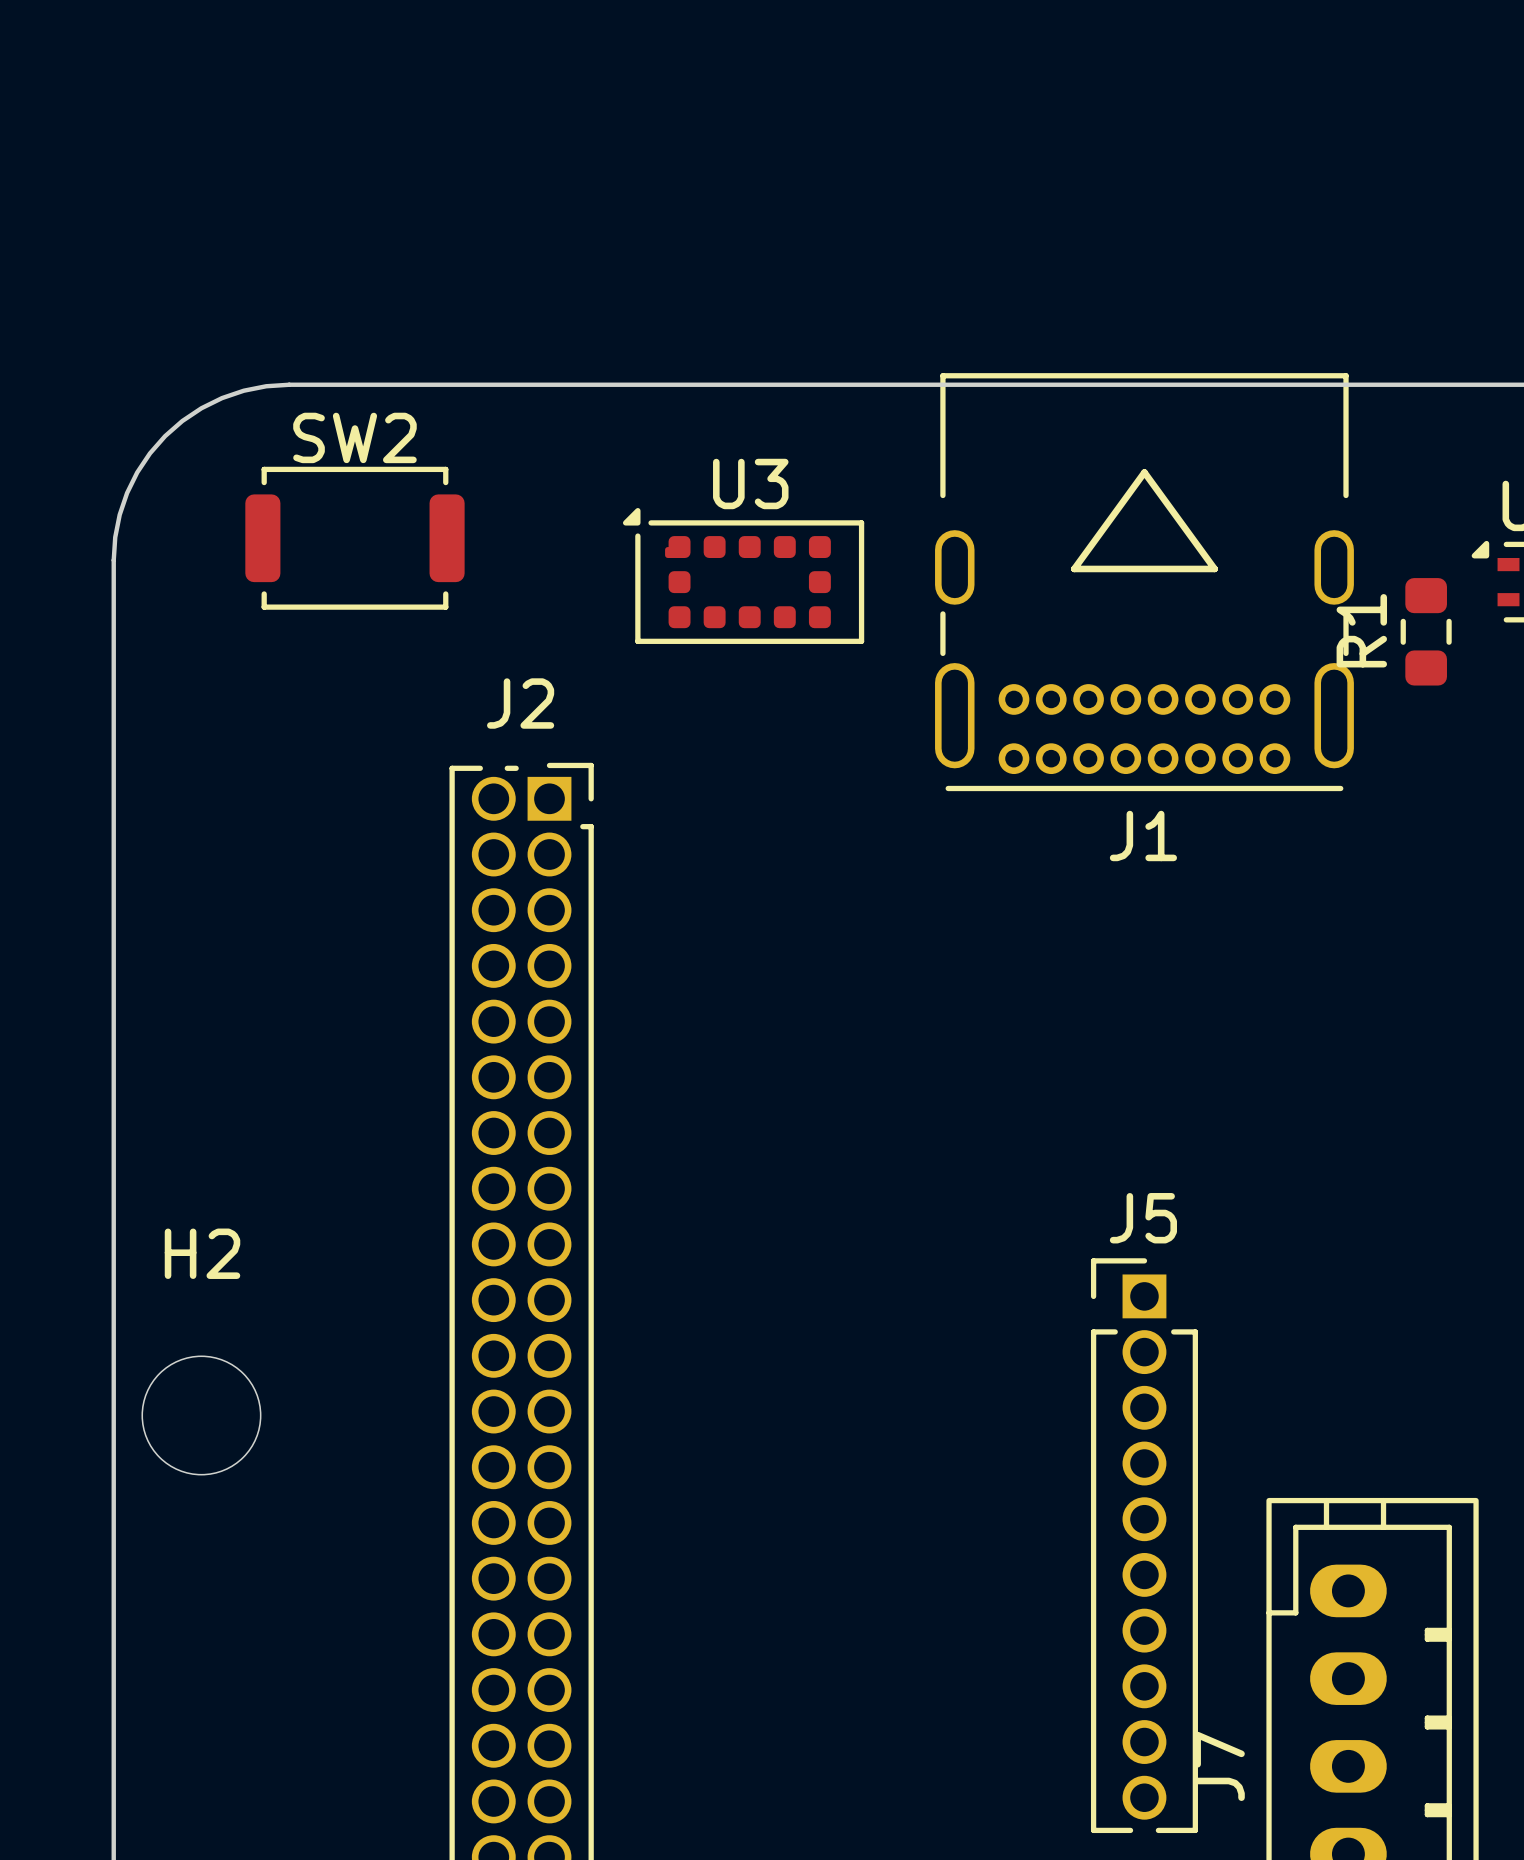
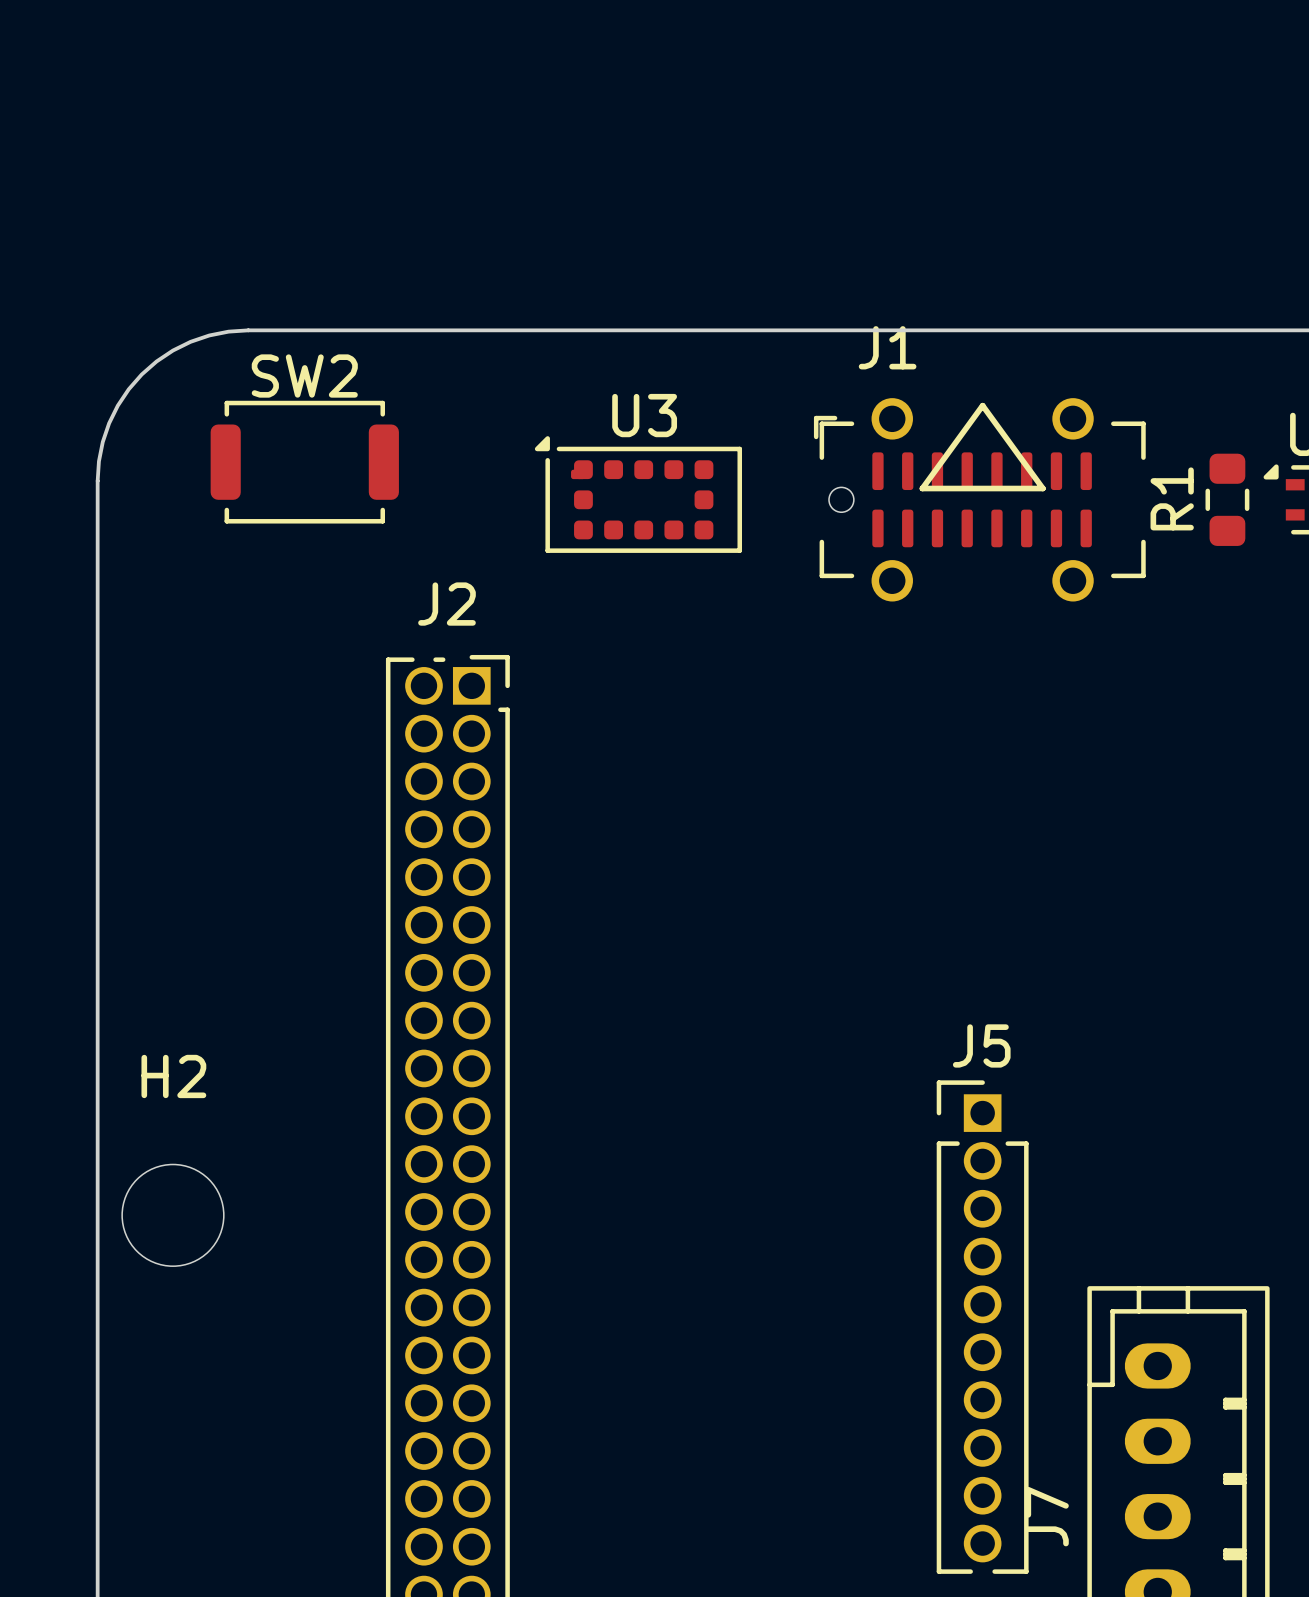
J1 footprint: [935, 373, 1354, 792] -> [813, 398, 1146, 602]
R1 position: (1426, 631) -> (1227, 499)
J1 name position: J1 (1143, 835) -> J1 (887, 347)

